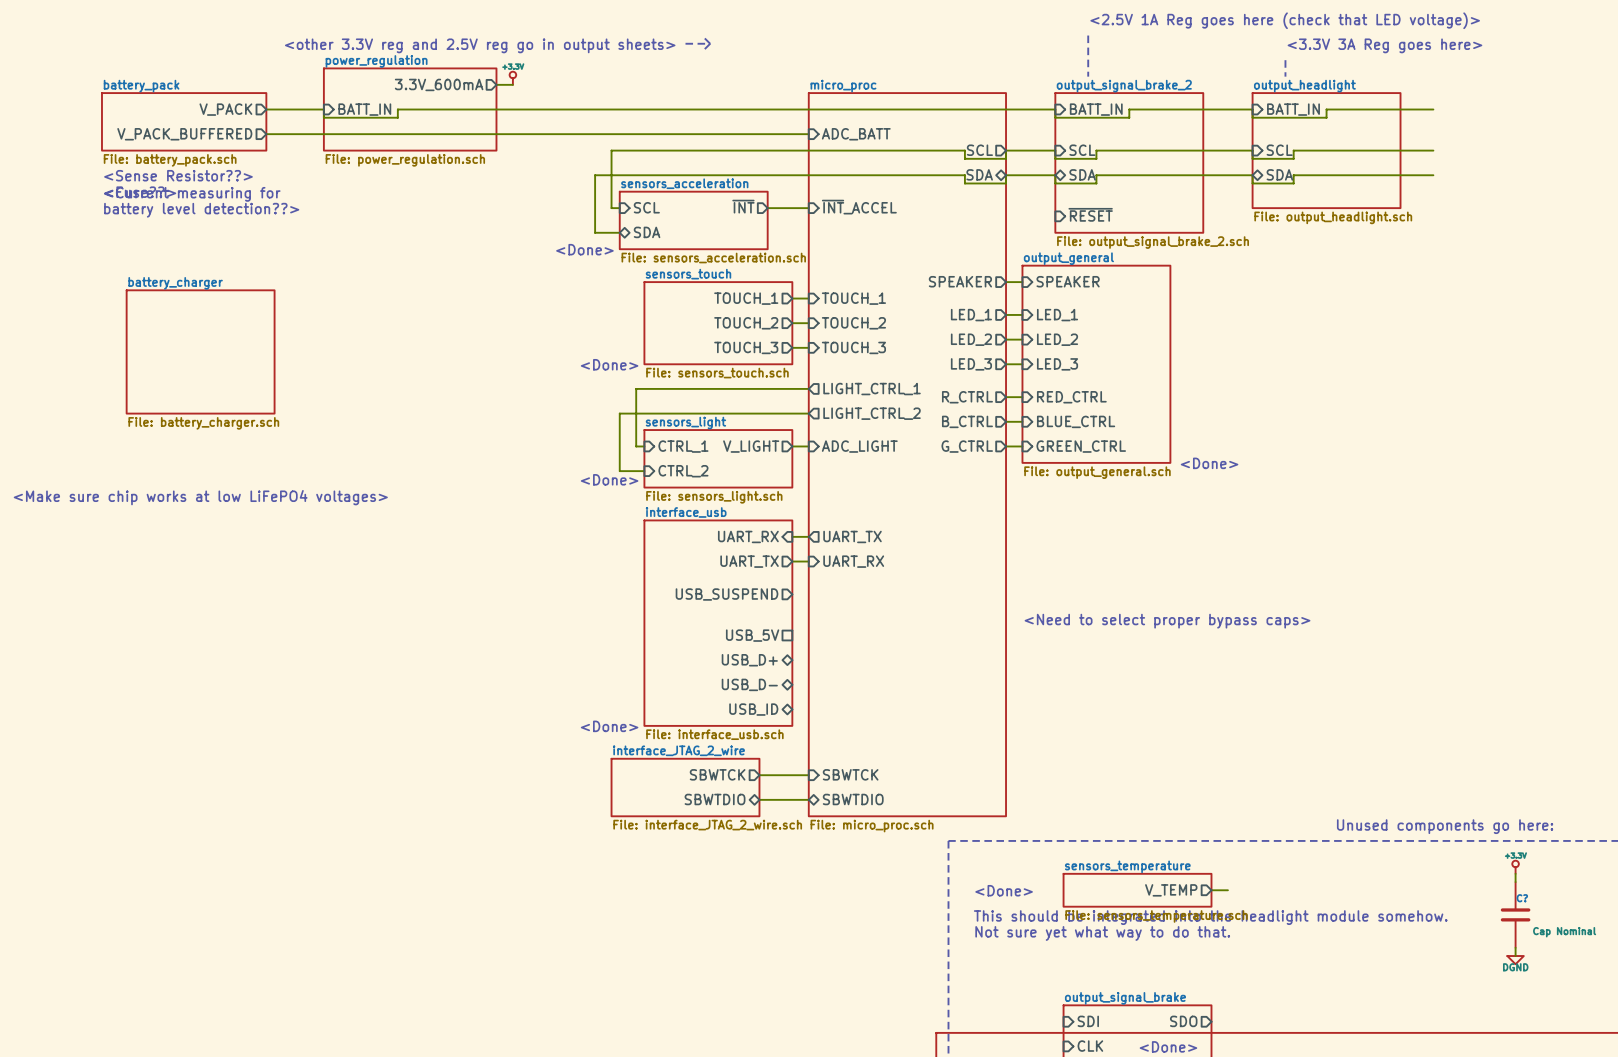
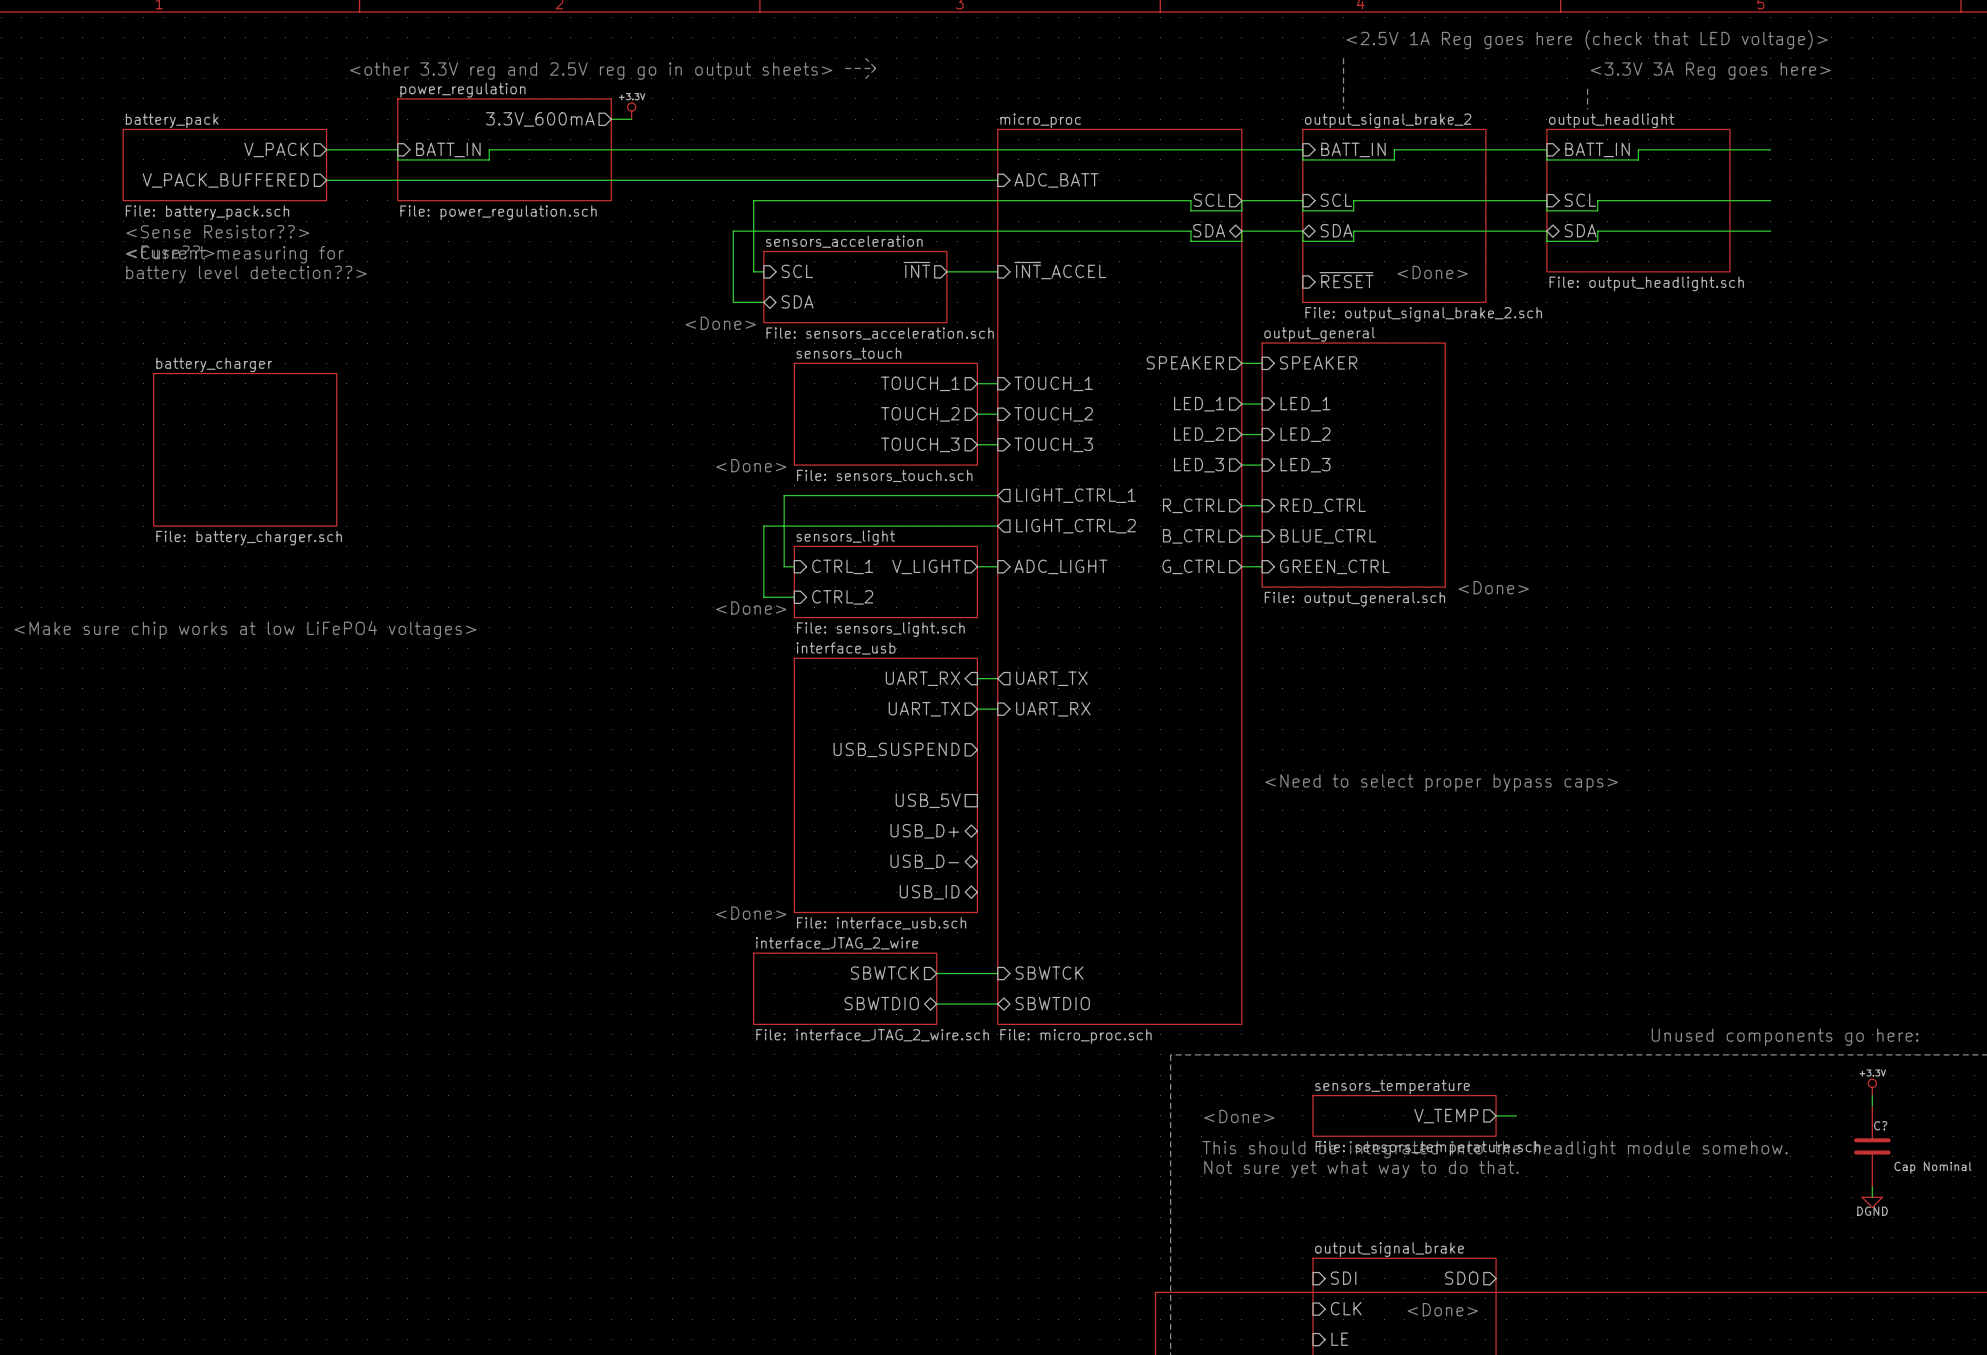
text: none -> <Done> (1432, 272)

